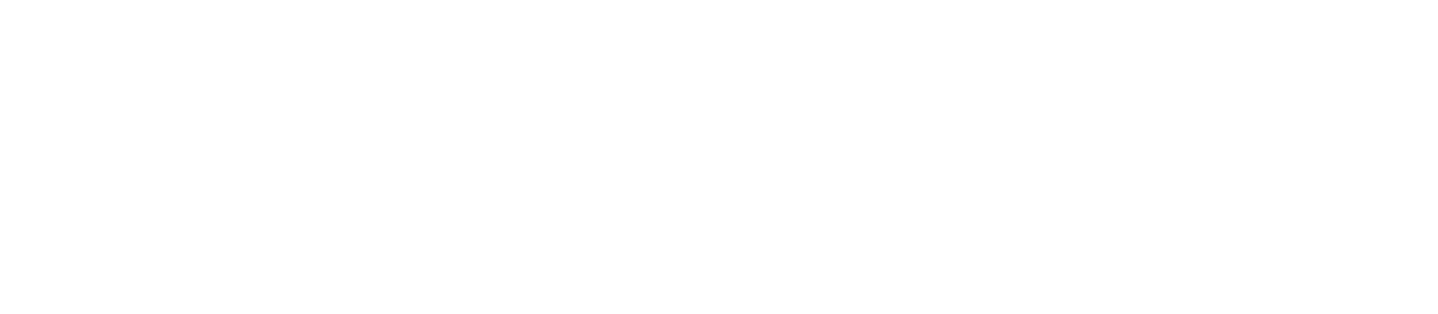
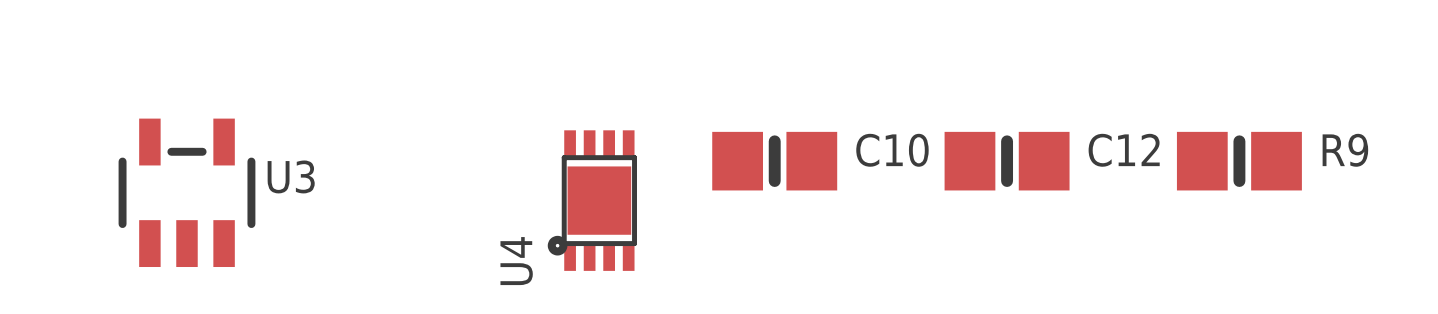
C10: none -> (774, 161)
C12: none -> (1007, 161)
R9: none -> (1239, 161)
U3: none -> (186, 192)
U4: none -> (592, 200)

